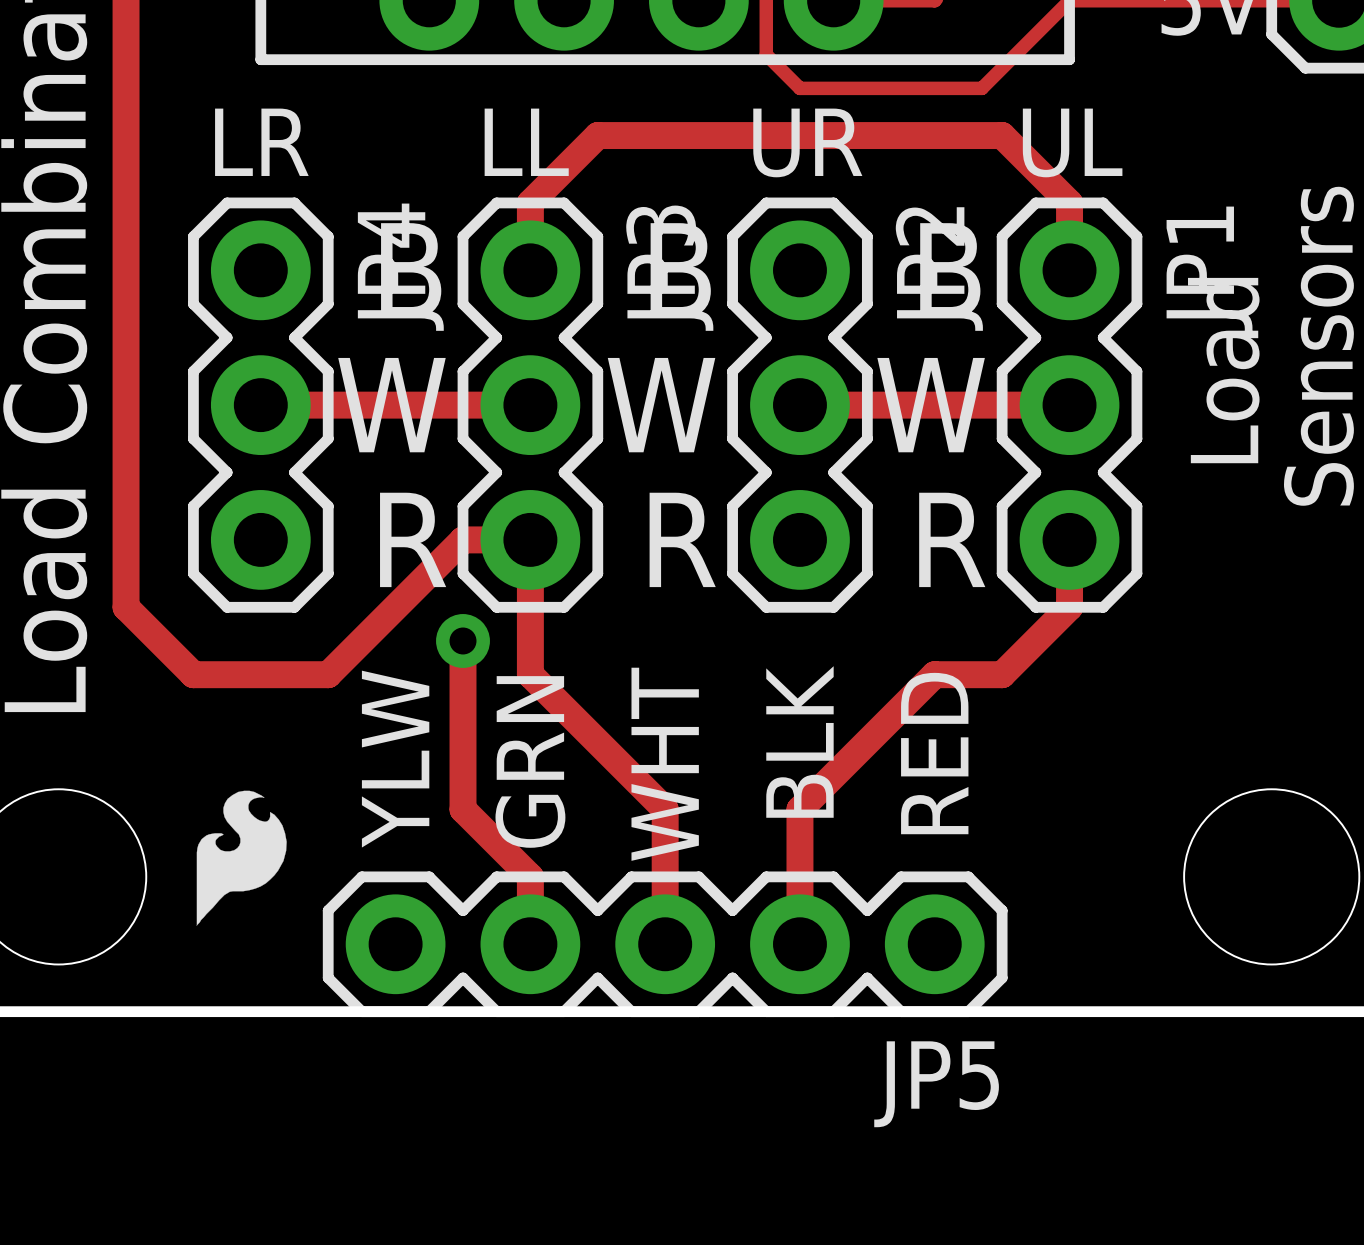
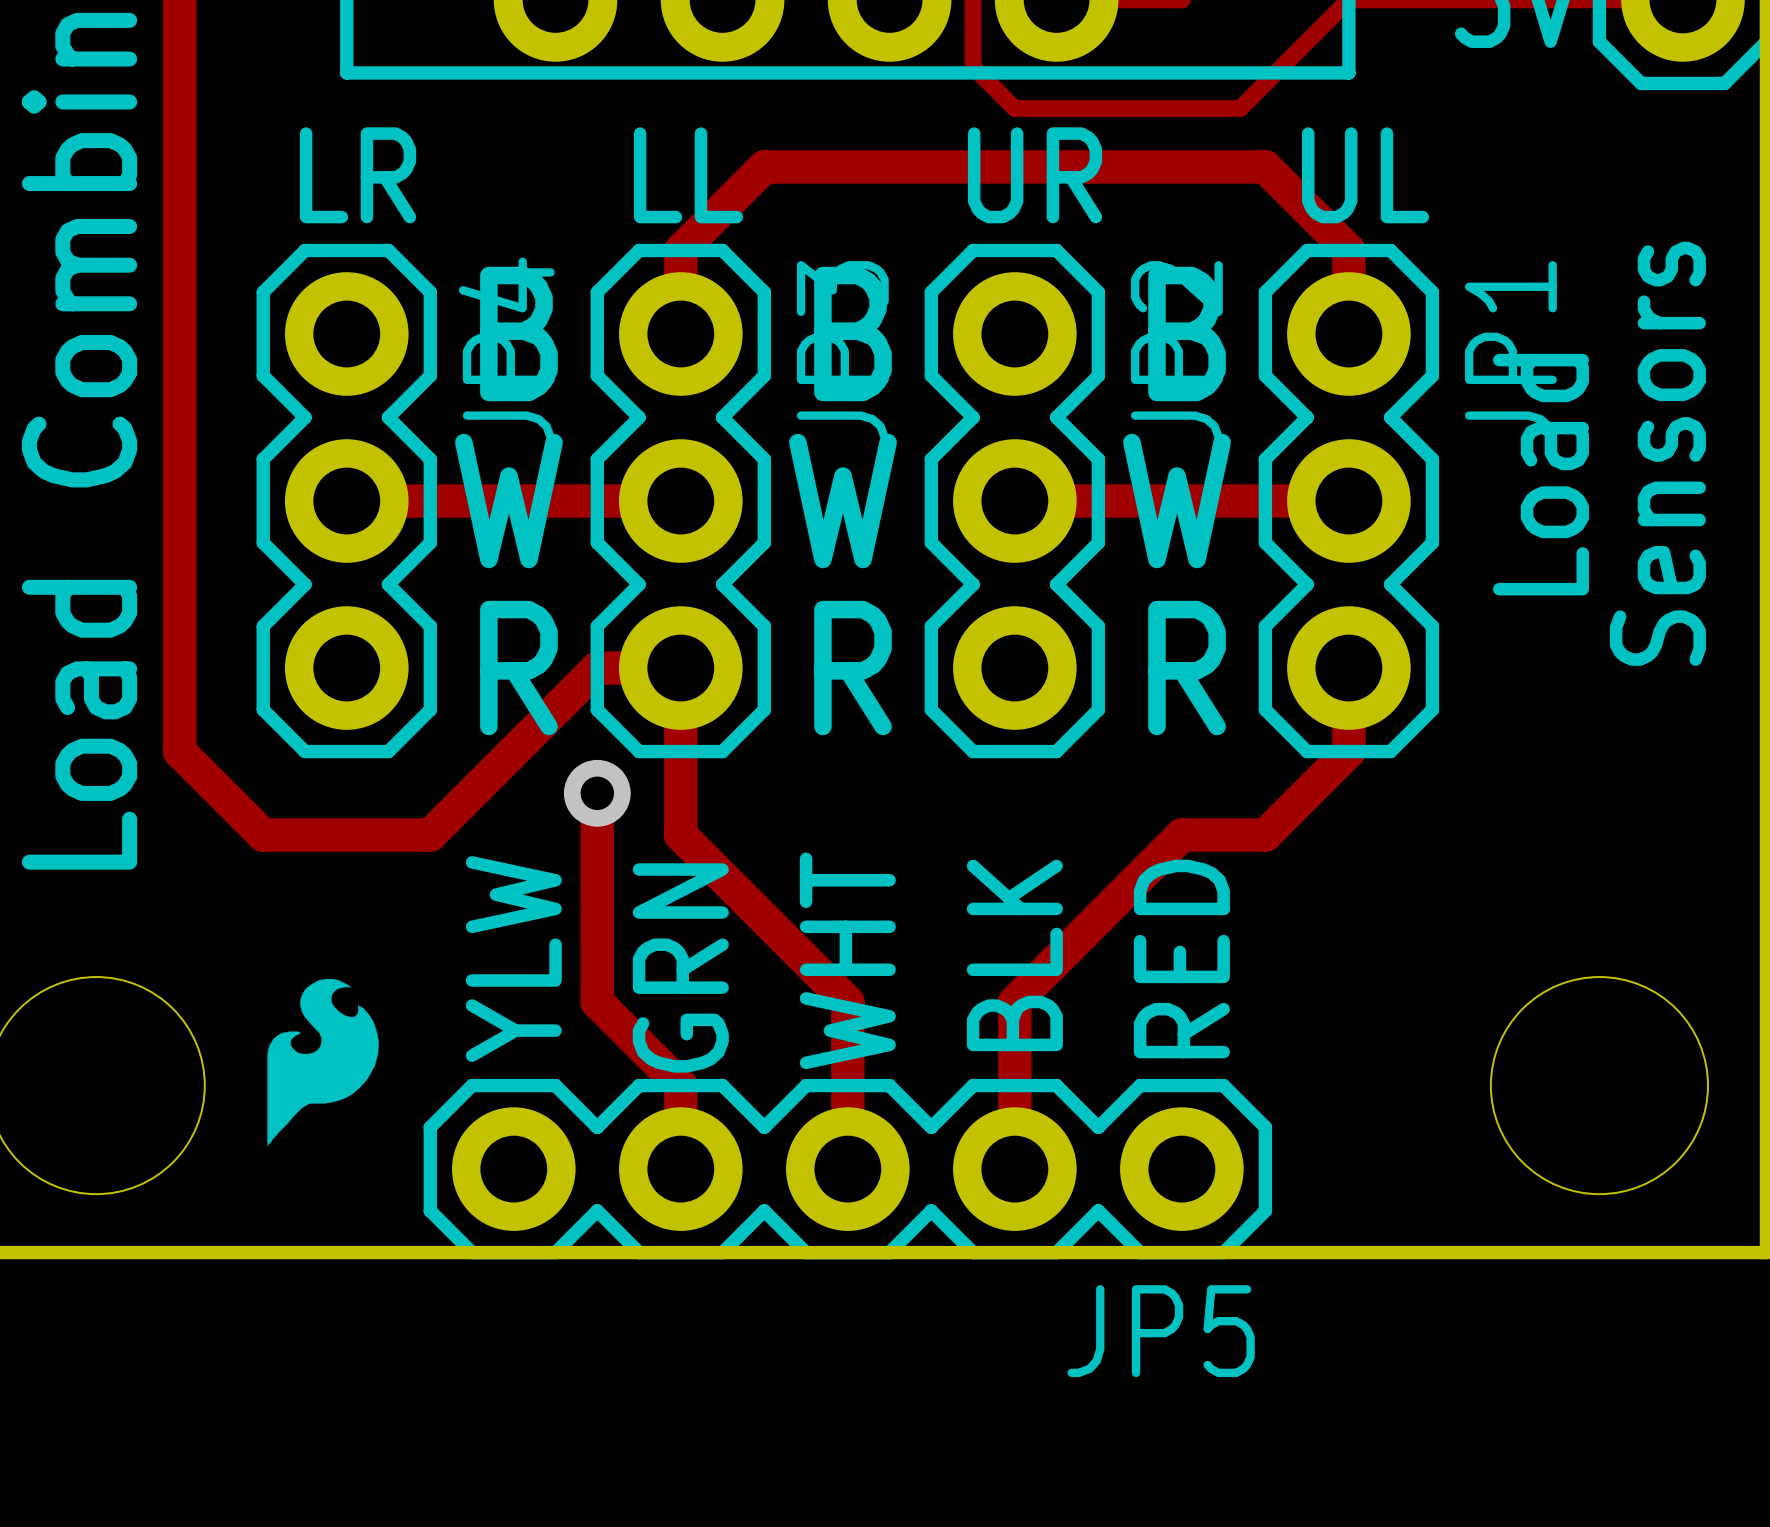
text position: BLK (799, 741) -> BLK (1014, 955)
text position: RED (934, 753) -> RED (1181, 959)
text position: YLW (395, 759) -> YLW (513, 959)
text position: GRN (530, 761) -> GRN (680, 967)
text position: WHT (665, 764) -> WHT (847, 960)

